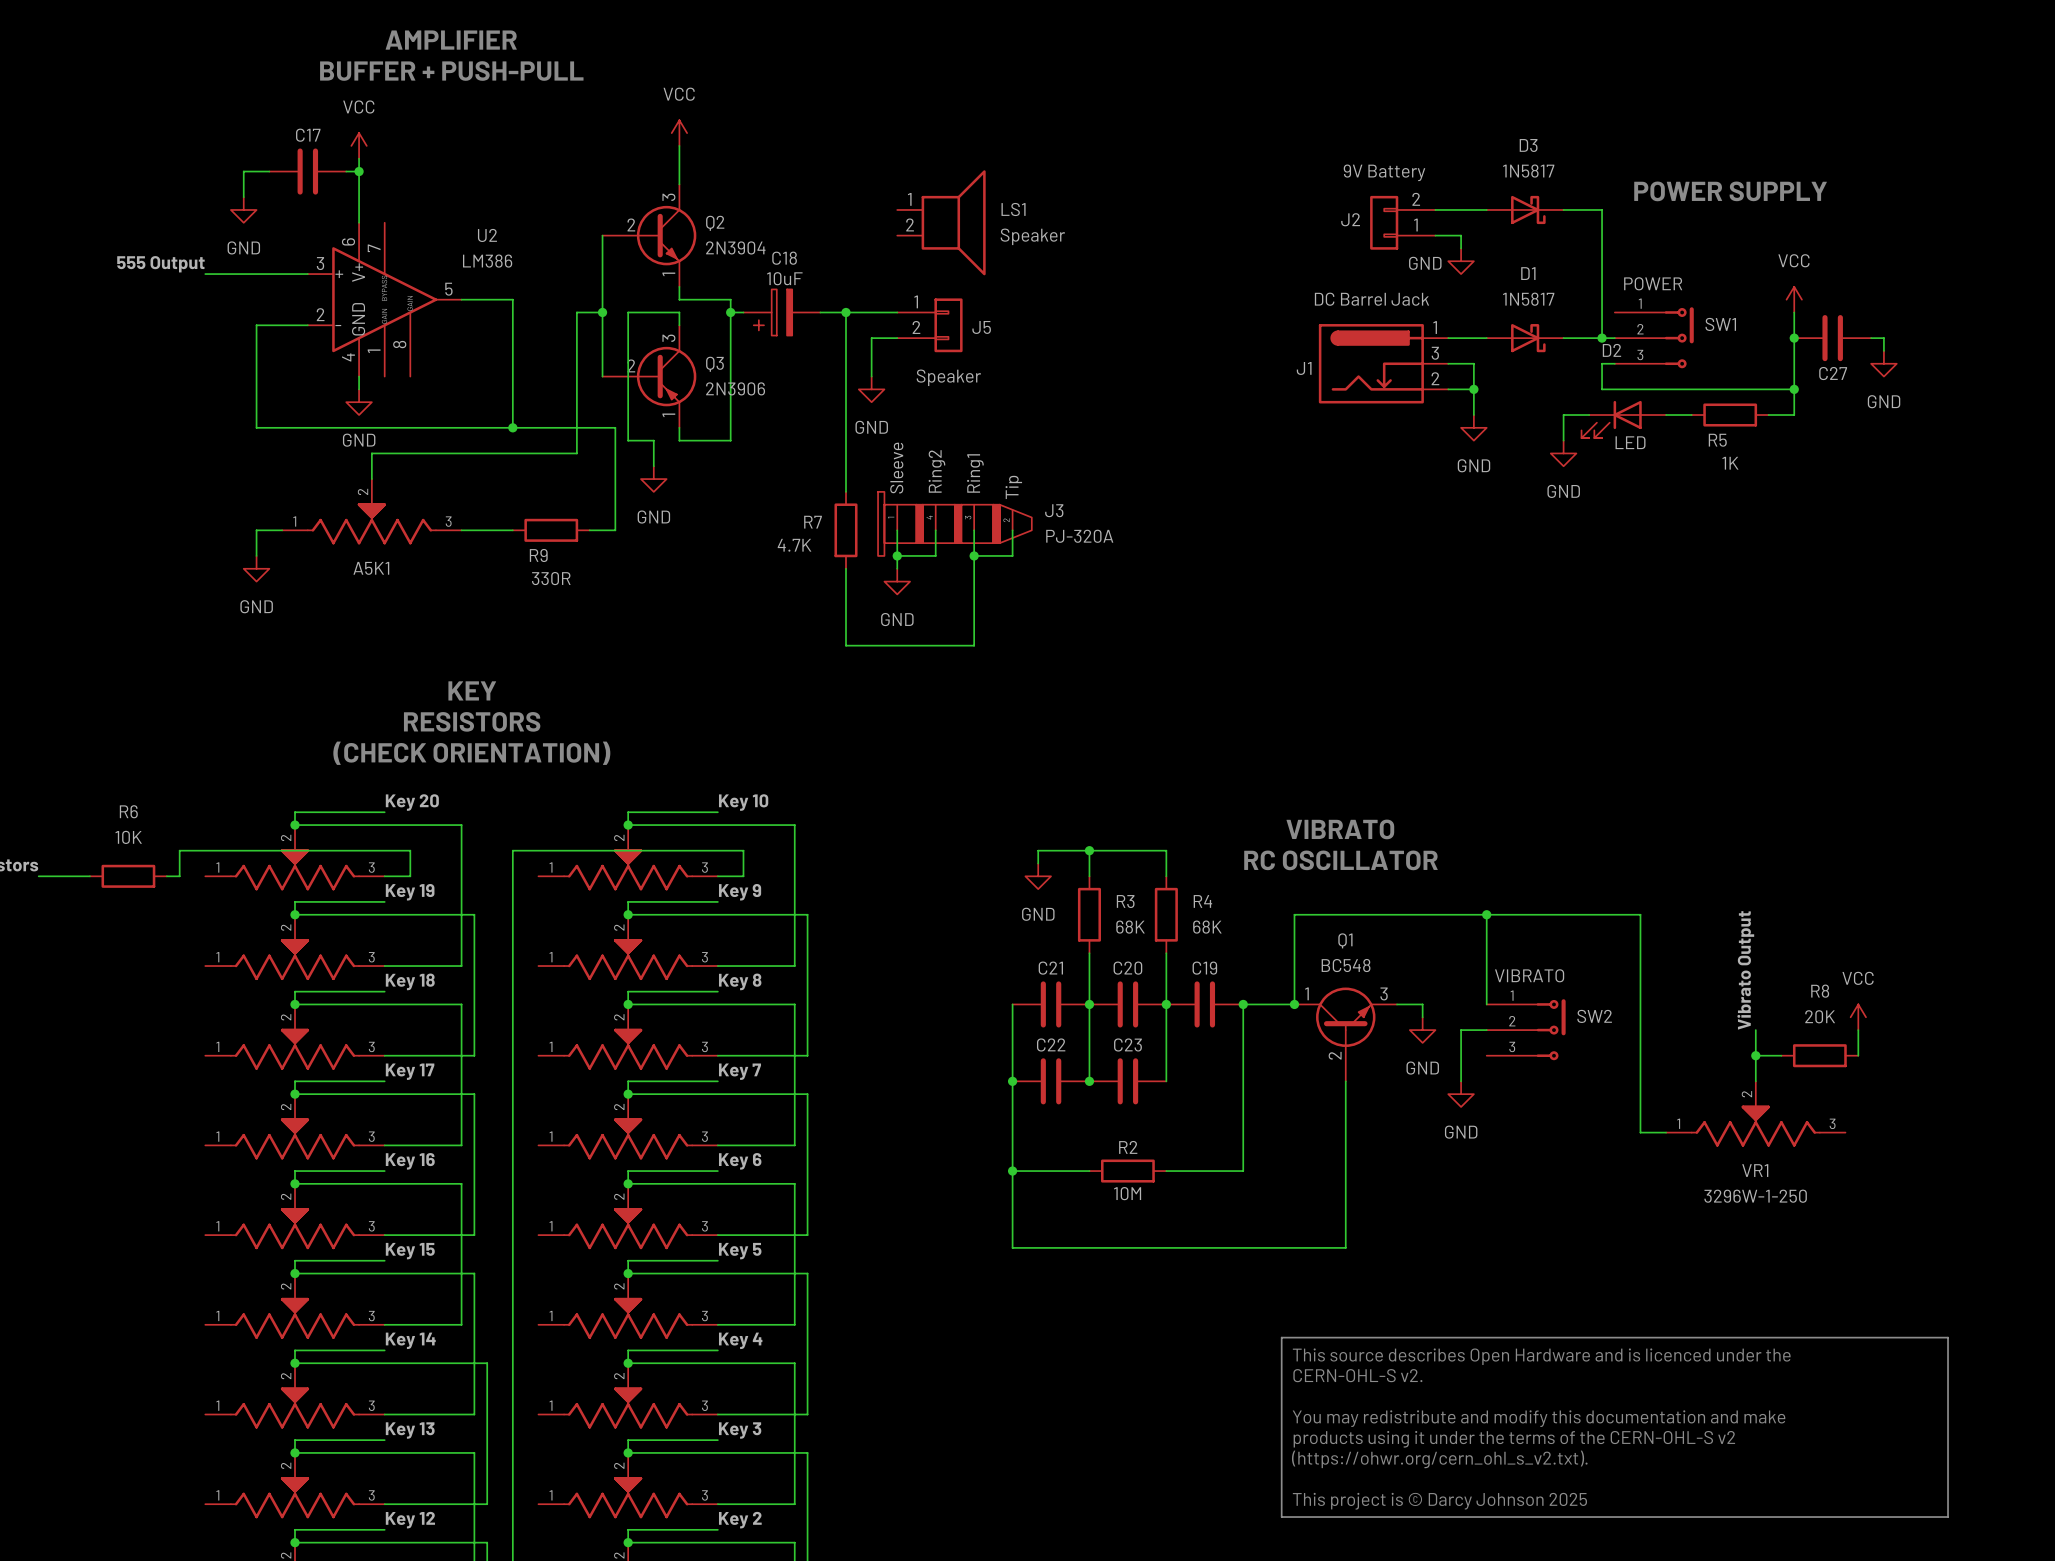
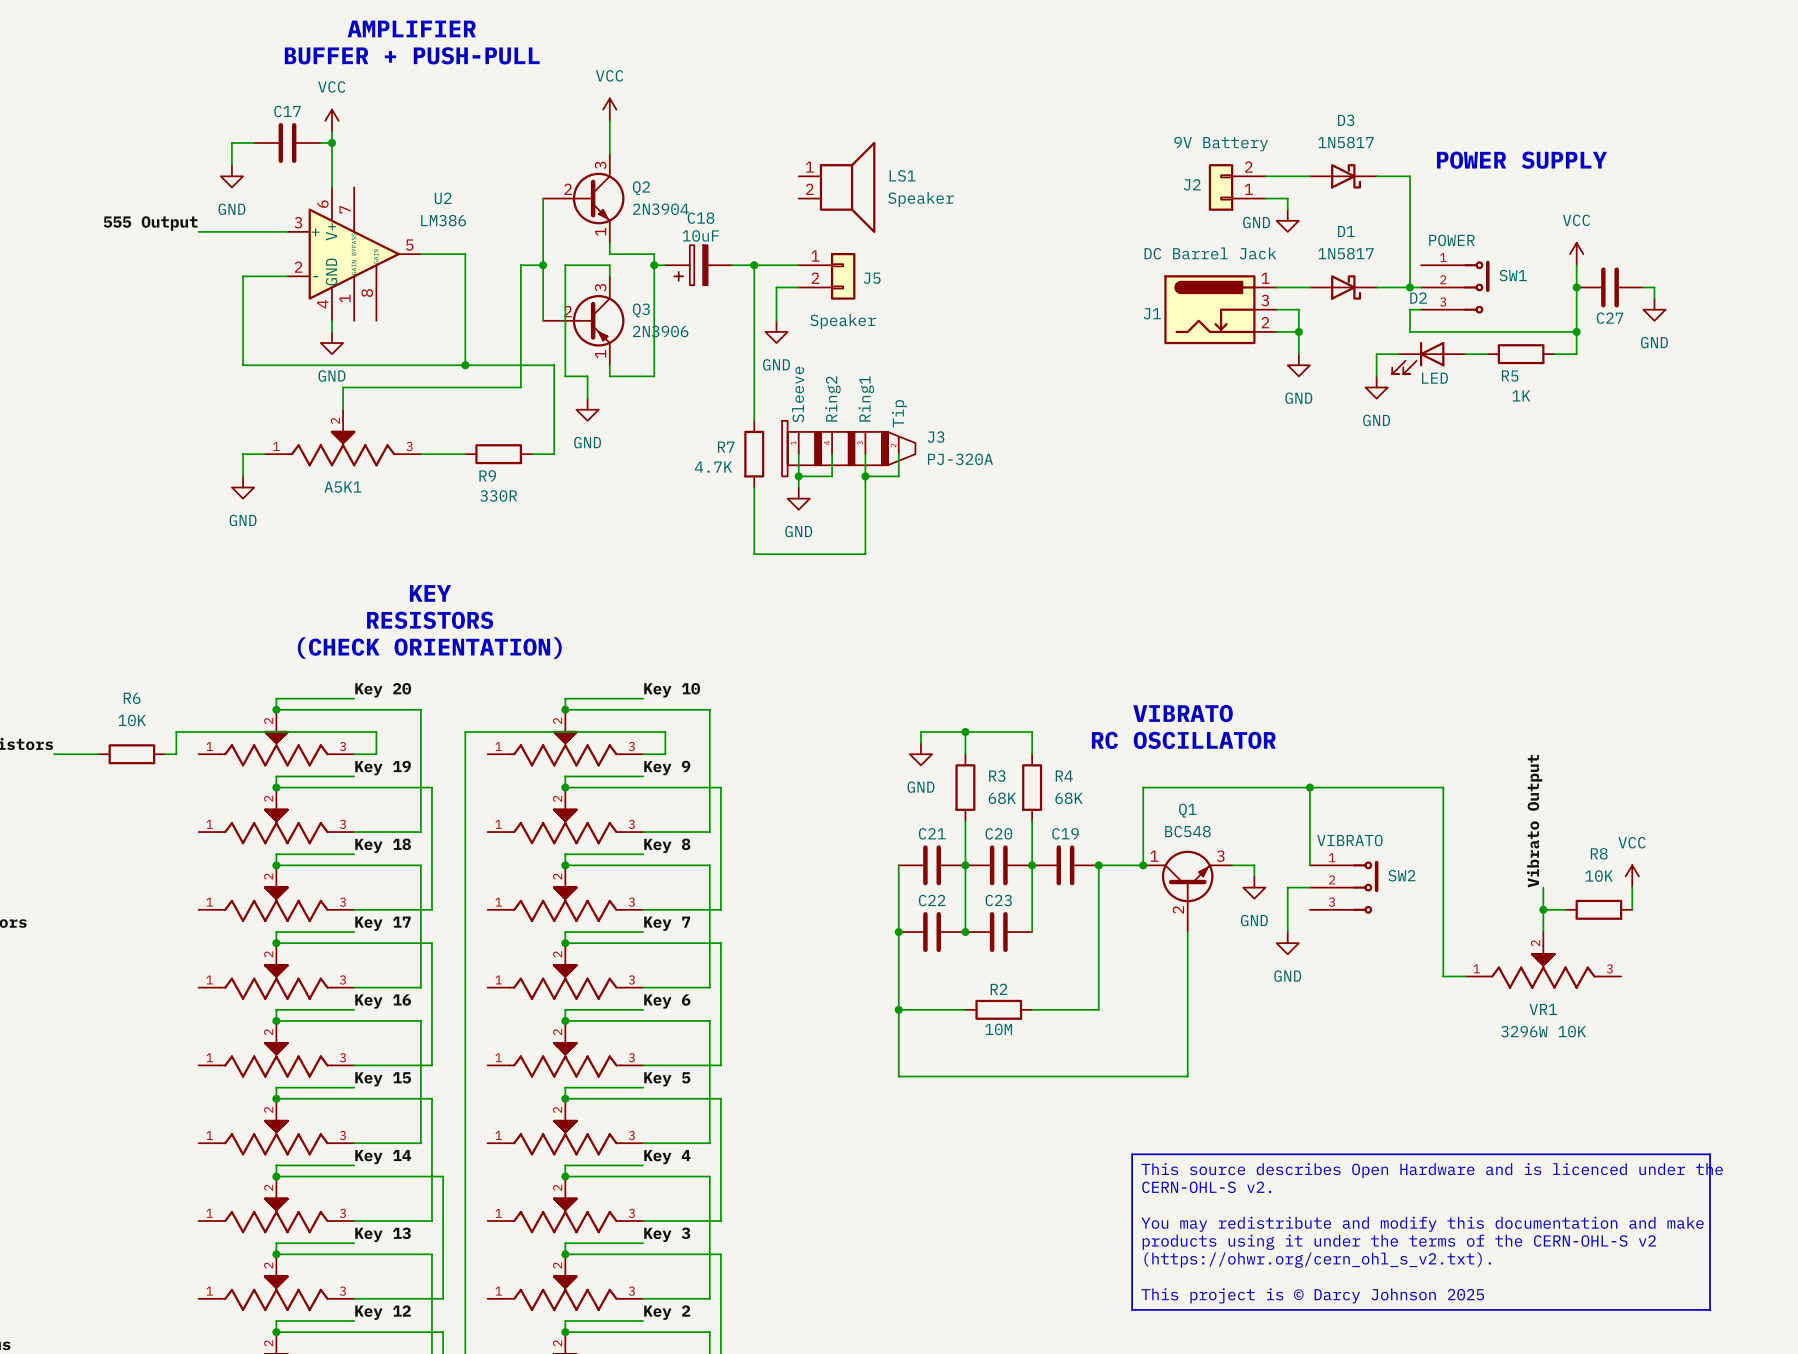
R8 value: 20K (1820, 1016) -> 10K (1599, 876)
VR1 value: 3296W-1-250 (1755, 1196) -> 3296W 10K (1543, 1031)

